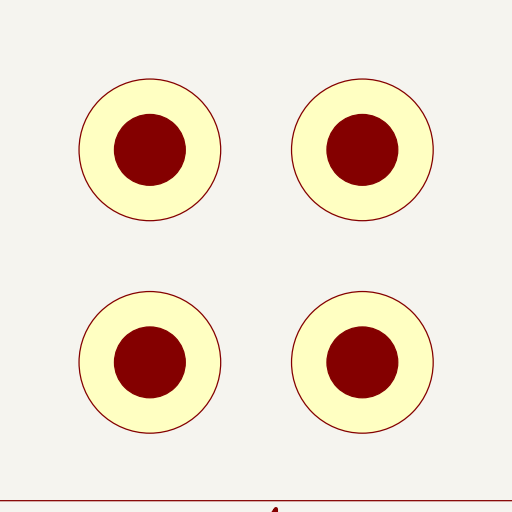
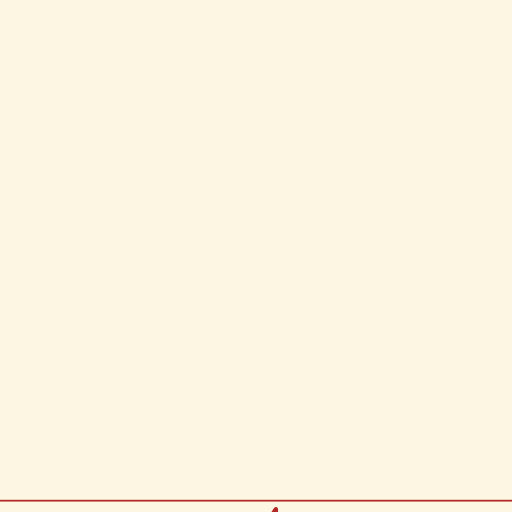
part: (149, 149) -> none
part: (362, 149) -> none
part: (149, 362) -> none
part: (362, 362) -> none

